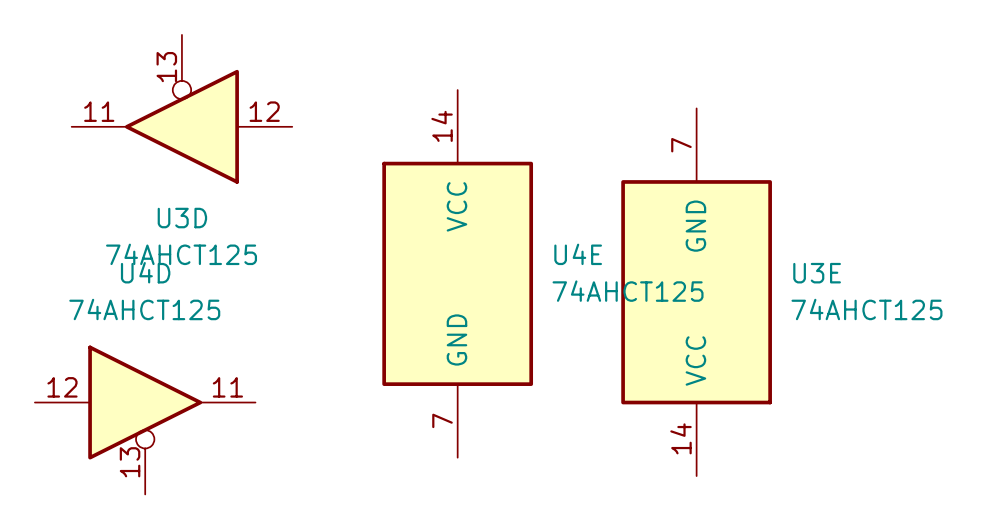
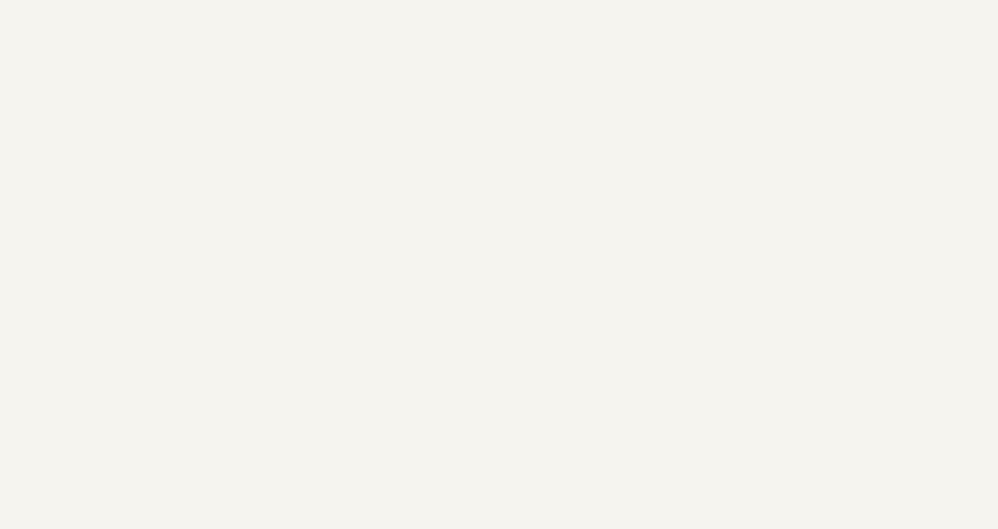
U3D: 74AHCT125 (181, 109) -> none
U4E: 74AHCT125 (457, 273) -> none
U3E: 74AHCT125 (696, 292) -> none
U4D: 74AHCT125 (145, 419) -> none

